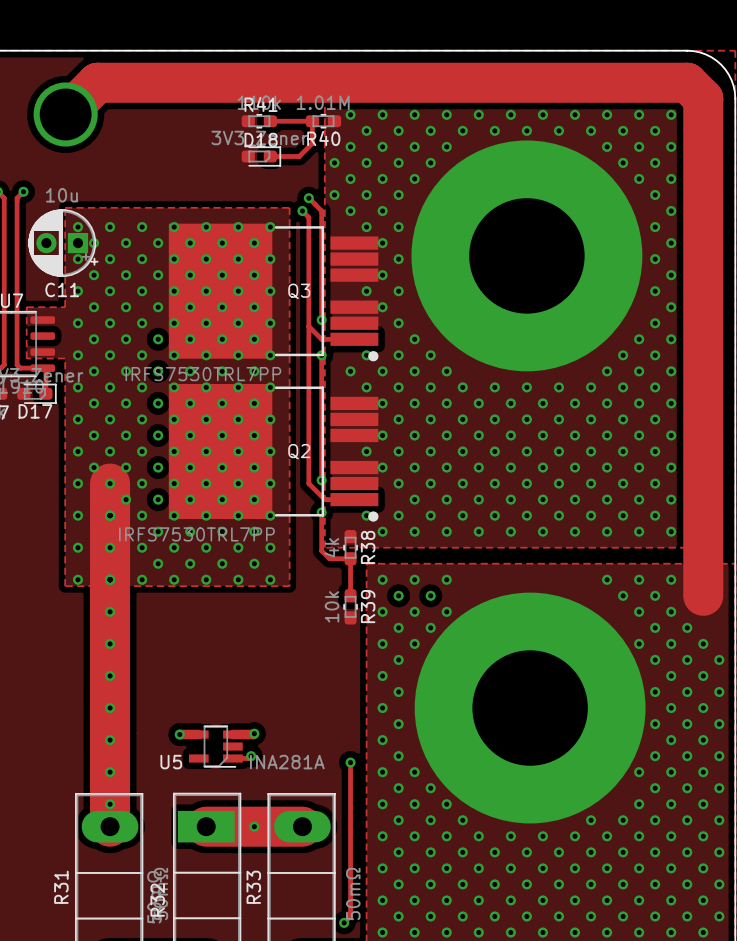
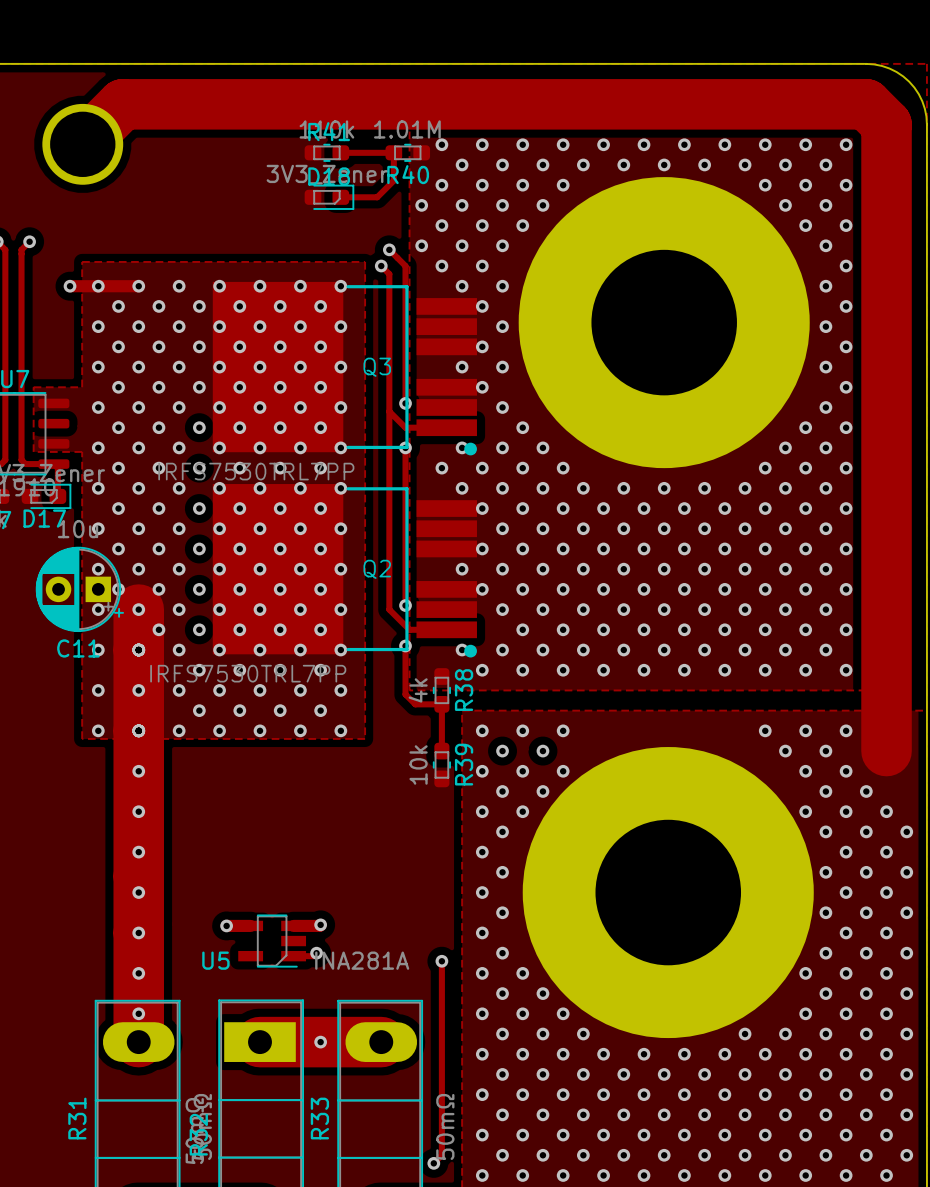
track: none -> (70, 286) (138, 286)
via: none -> (70, 286)
C11 position: (63, 243) -> (79, 589)

